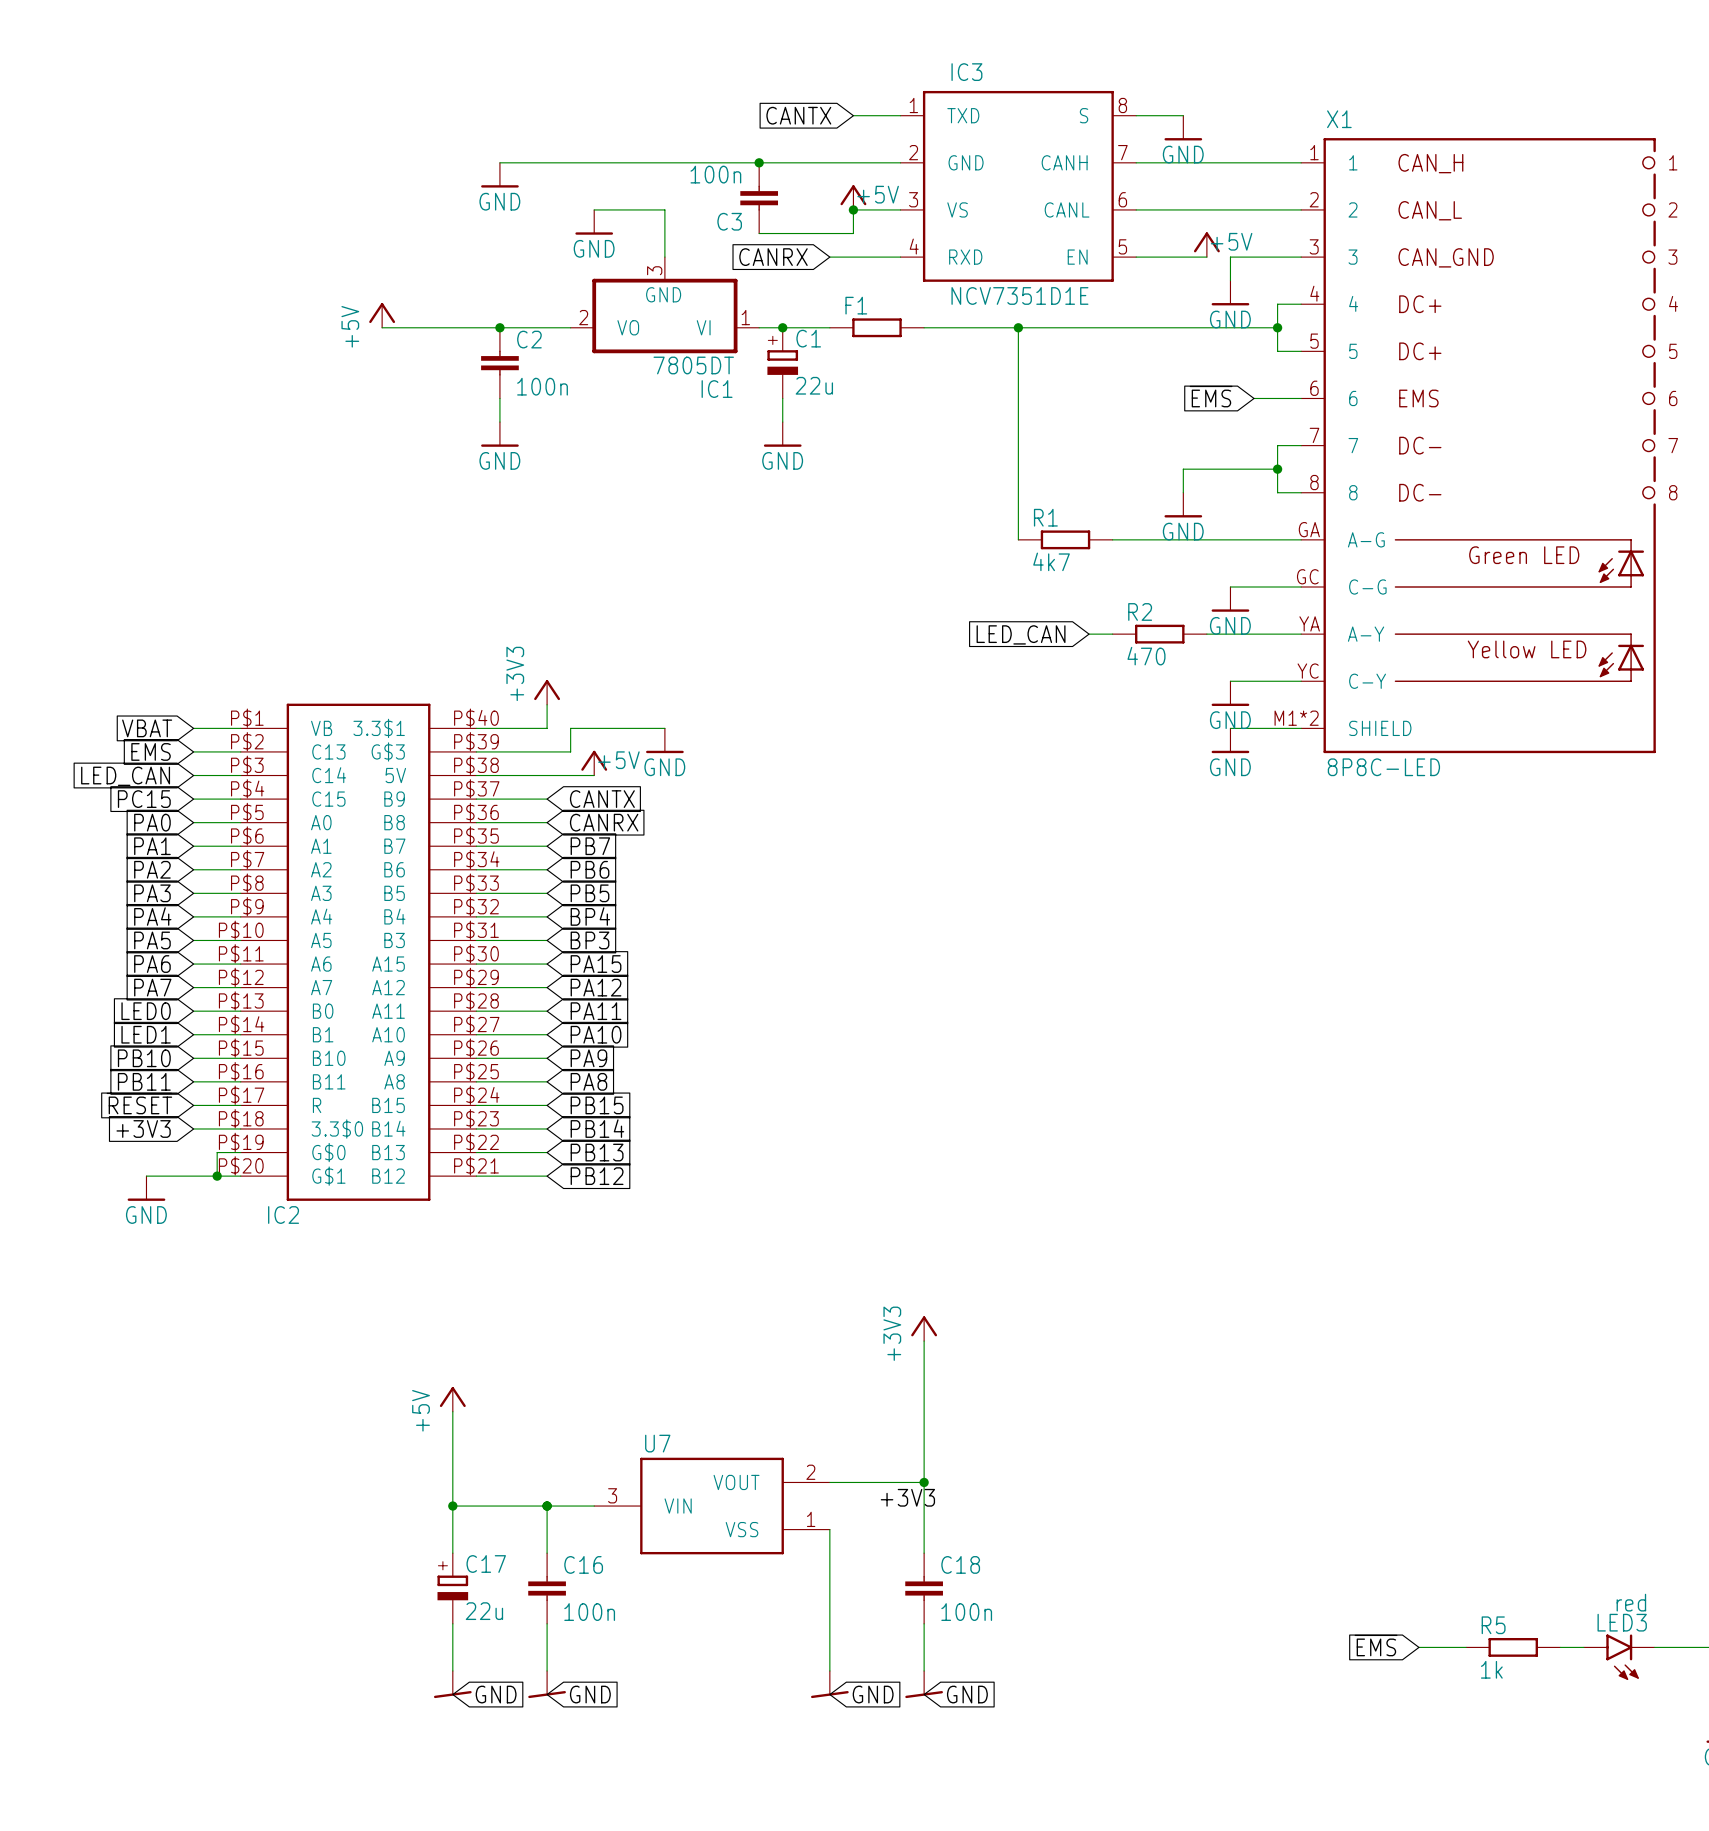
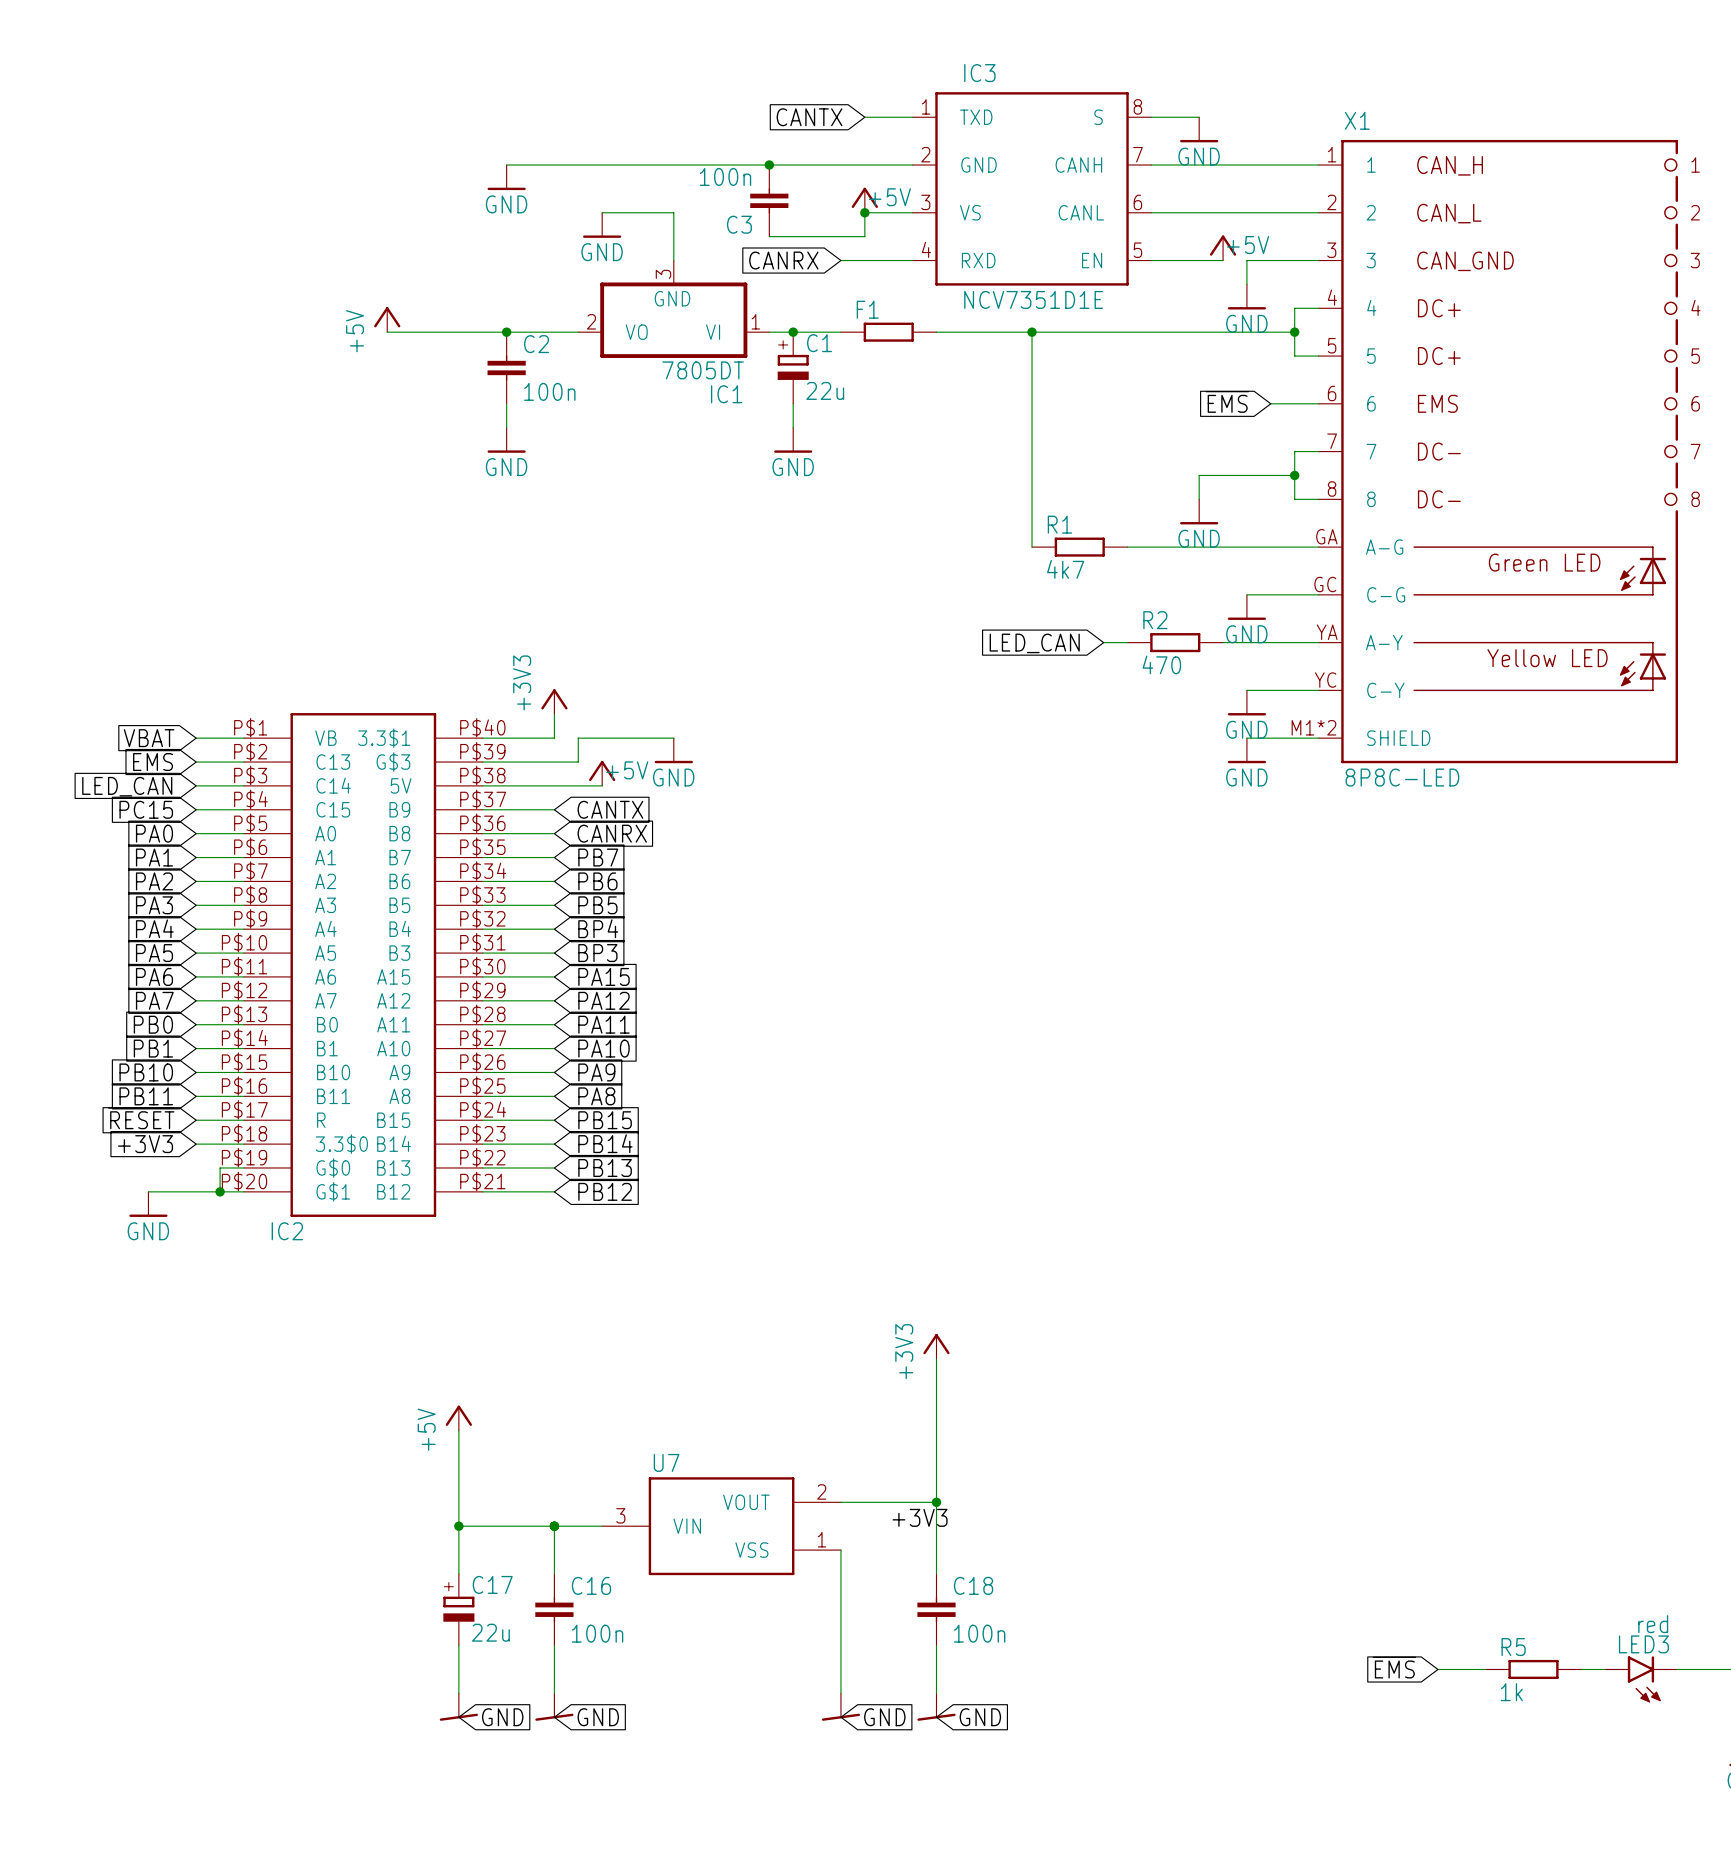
global label: LED0 (146, 1011) -> PB0 (153, 1024)
global label: LED1 (146, 1034) -> PB1 (153, 1048)

